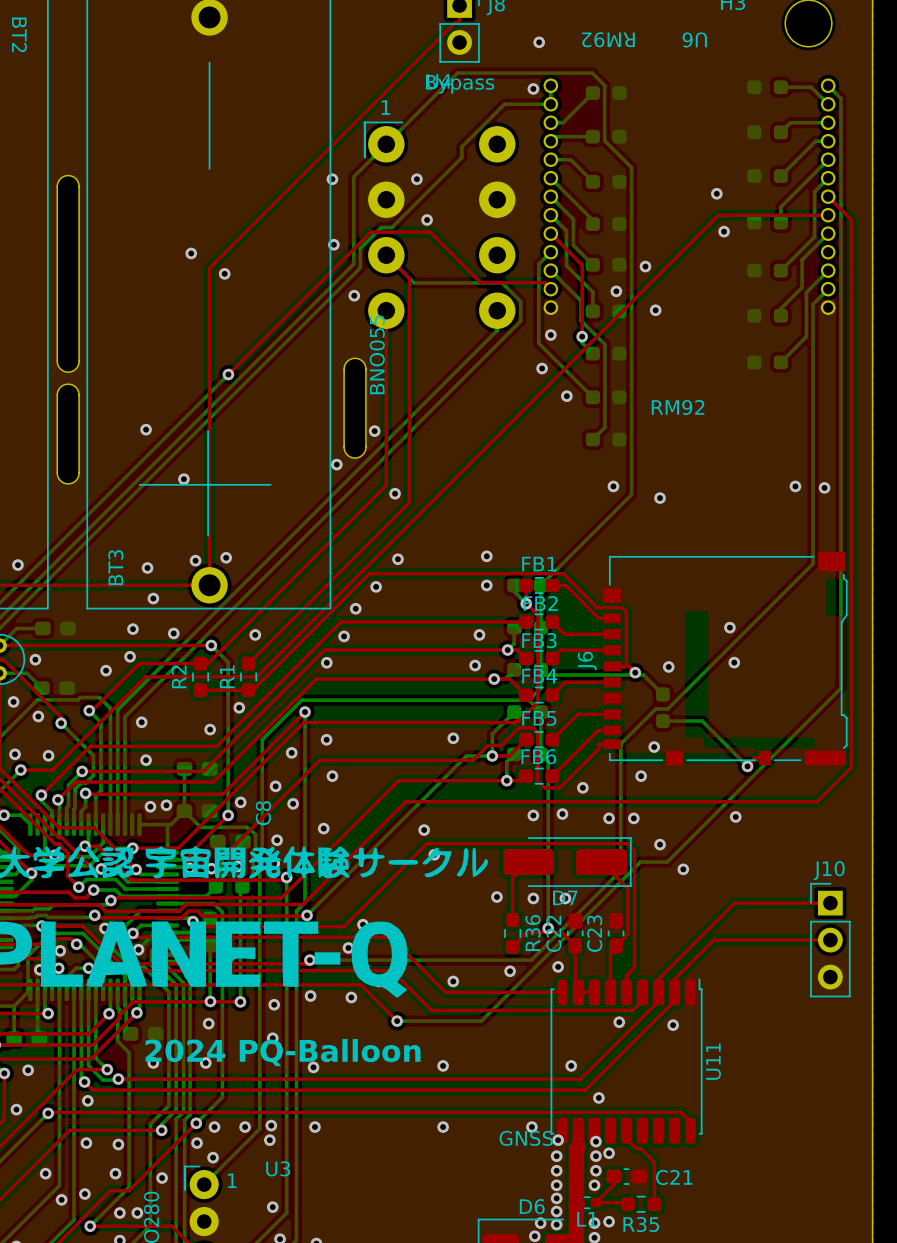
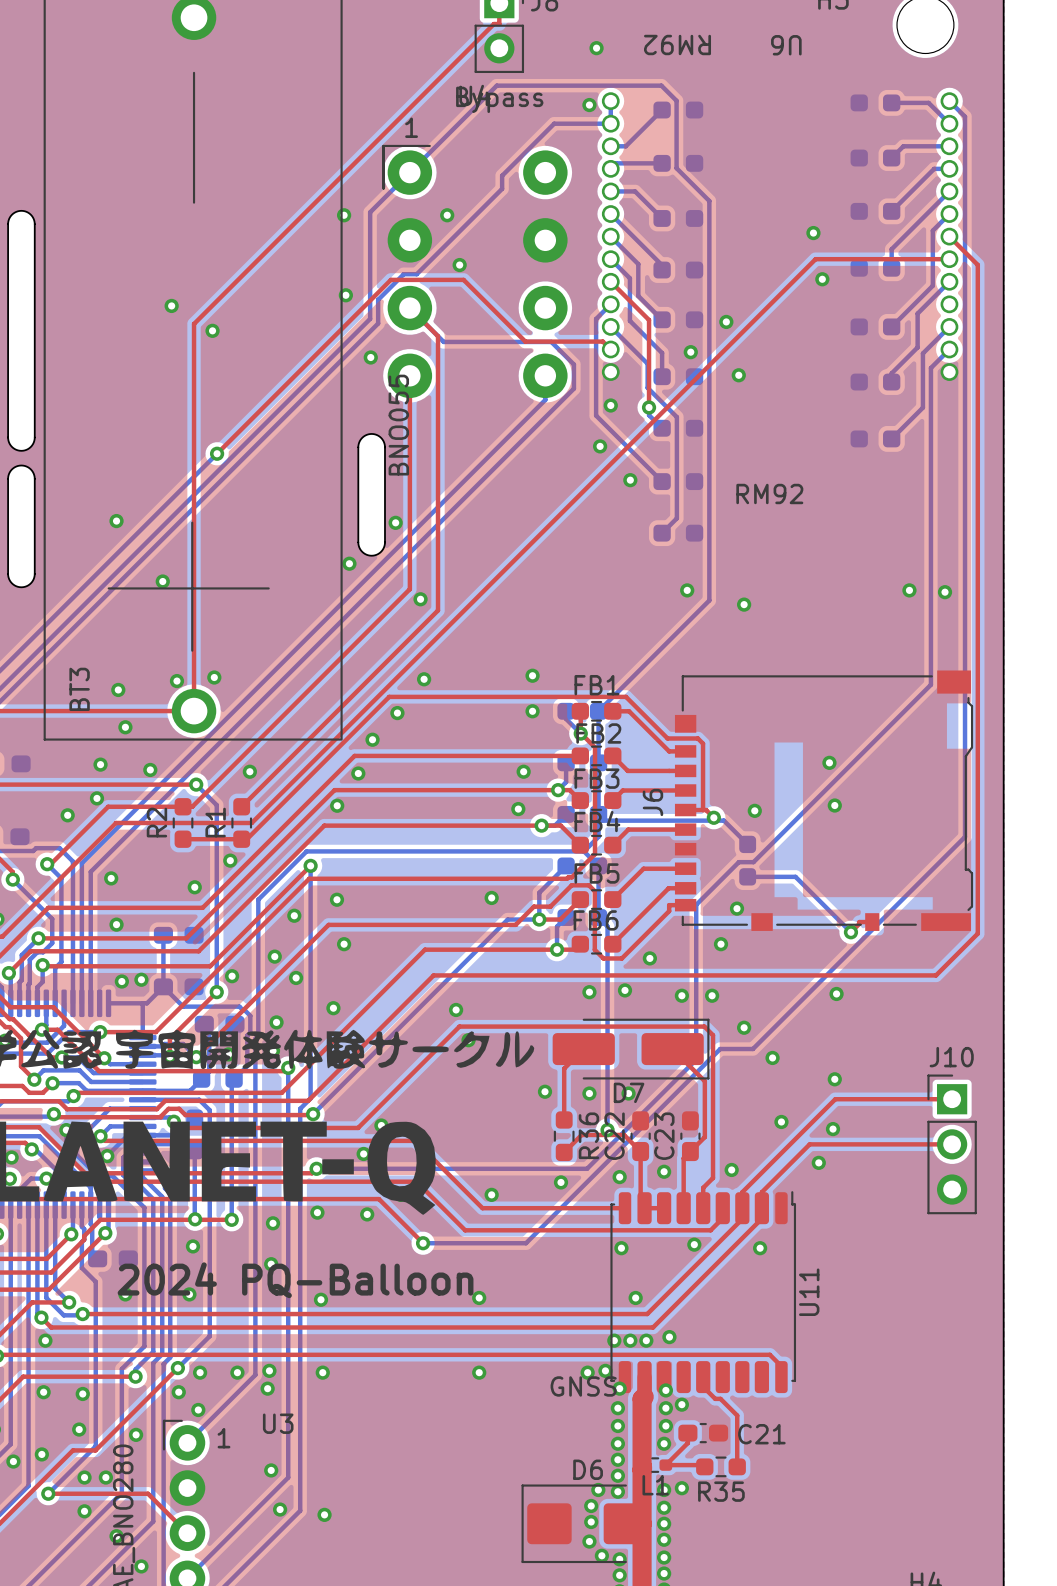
C8 name: C8 (263, 813) -> none
via: none -> (834, 1079)
via: none -> (781, 1121)
via: none -> (833, 1129)
via: none -> (818, 1162)
via: none -> (731, 1169)
via: none -> (664, 1171)
via: none -> (621, 1248)
via: none -> (614, 1340)
via: none -> (630, 1340)
via: none -> (646, 1340)
via: none -> (605, 1370)

